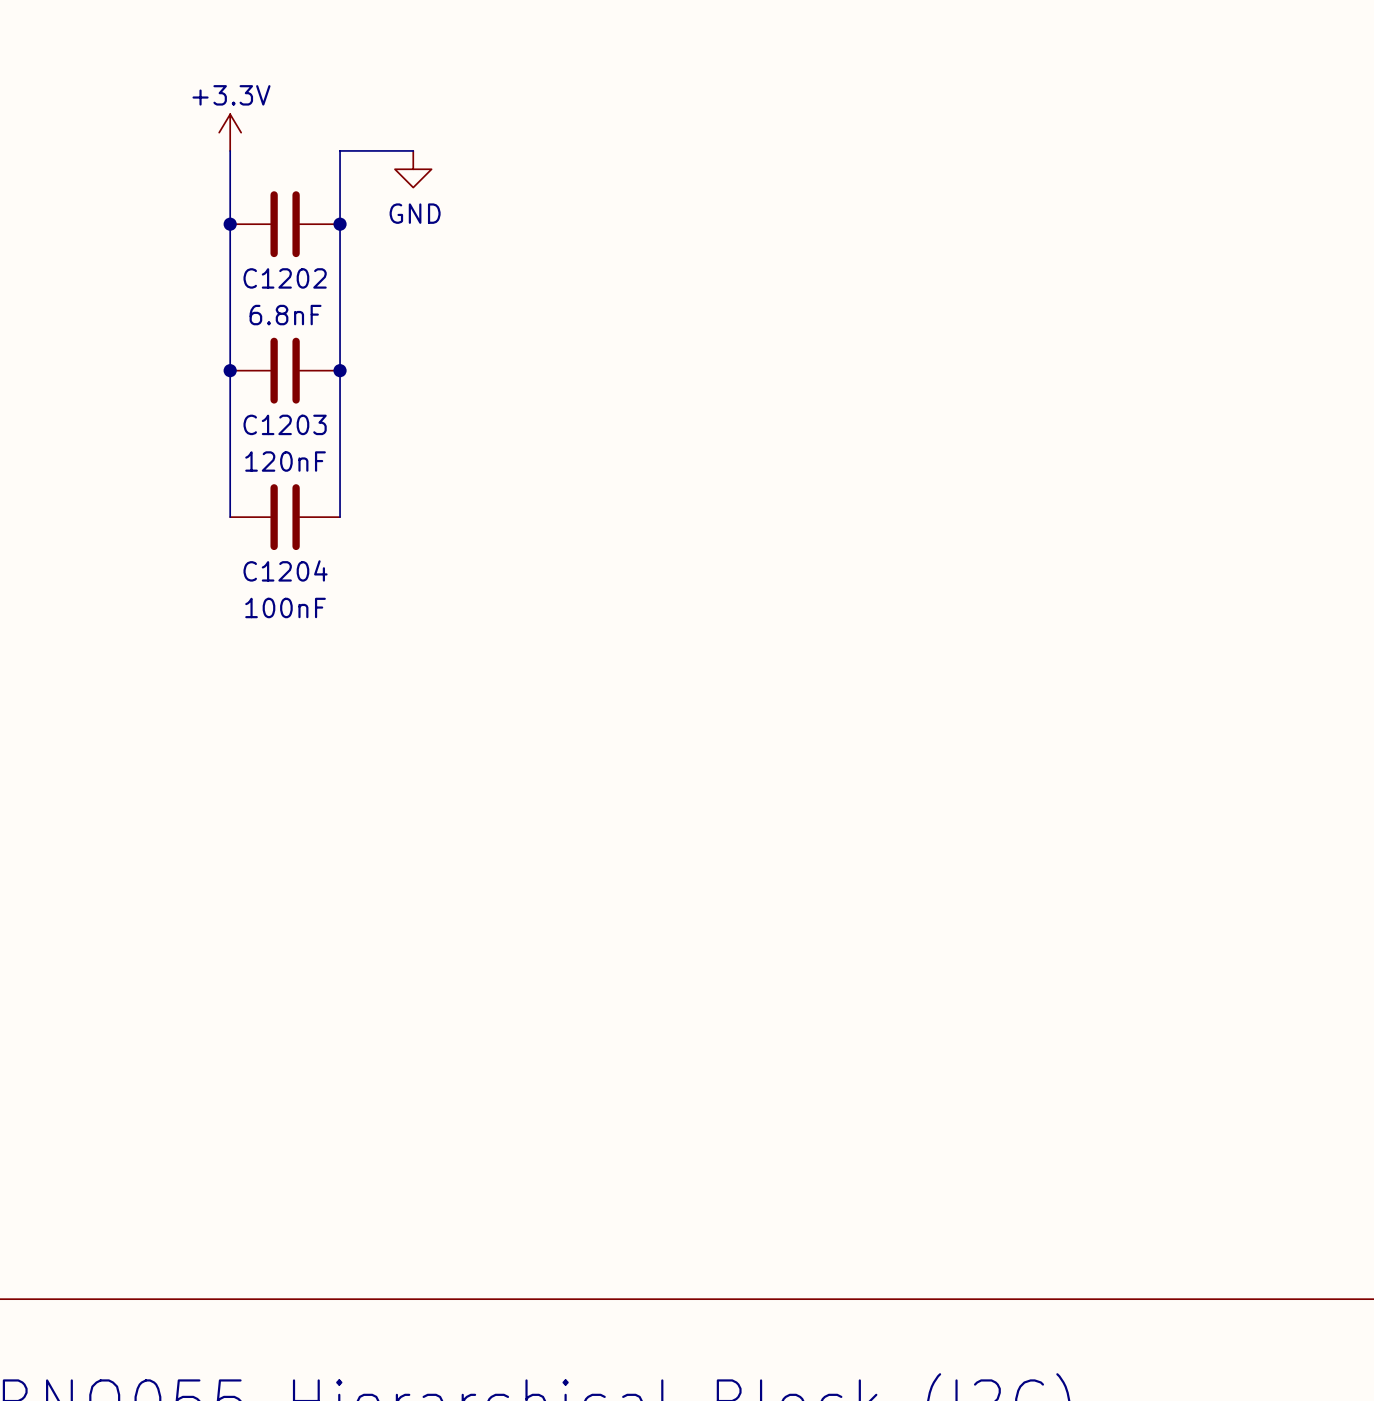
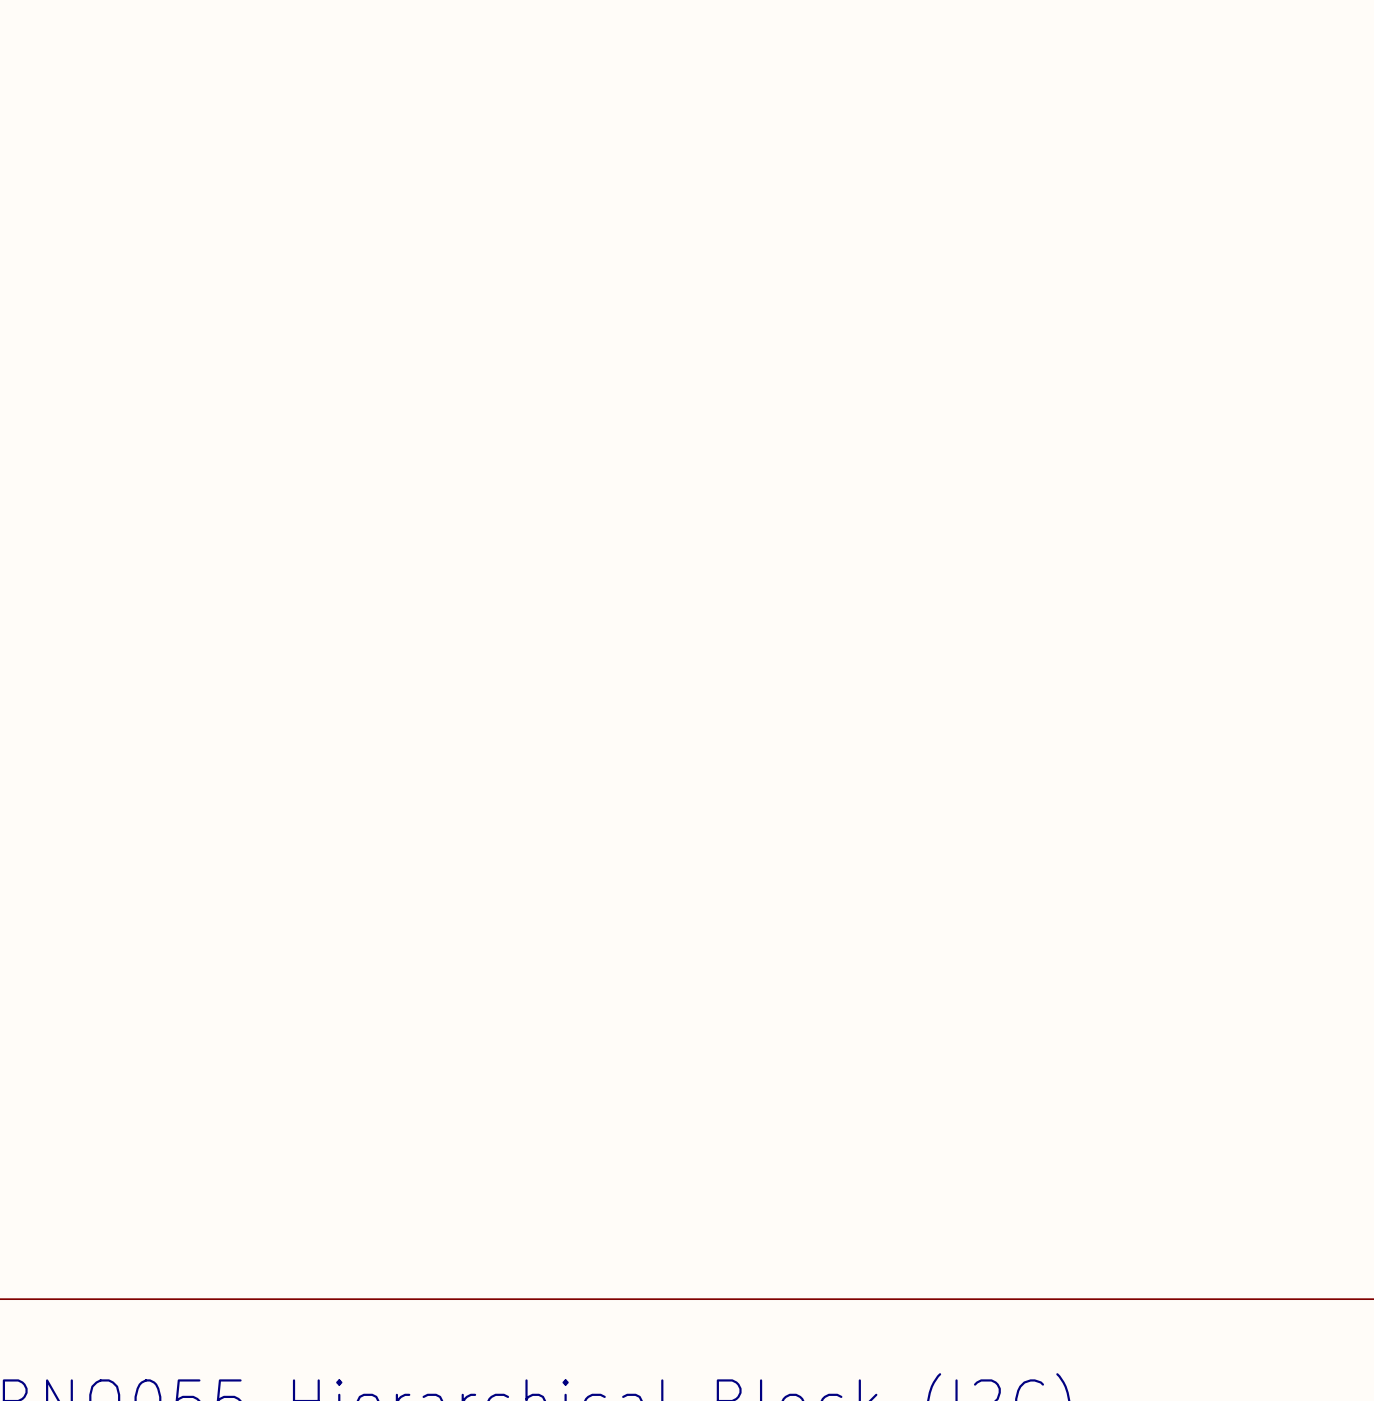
power symbol: +3.3V (230, 132) -> none
wire: (230, 150) (230, 517) -> none
wire: (413, 150) (340, 150) (340, 517) -> none
power symbol: GND (413, 169) -> none
junction: (230, 224) -> none
C1202: 6.8nF (285, 224) -> none
junction: (340, 224) -> none
junction: (230, 370) -> none
C1203: 120nF (285, 370) -> none
junction: (340, 370) -> none
C1204: 100nF (285, 517) -> none

